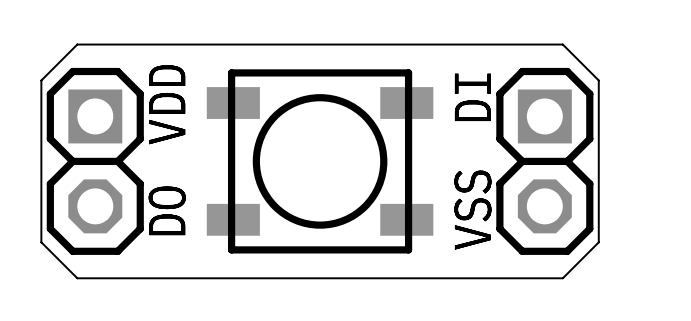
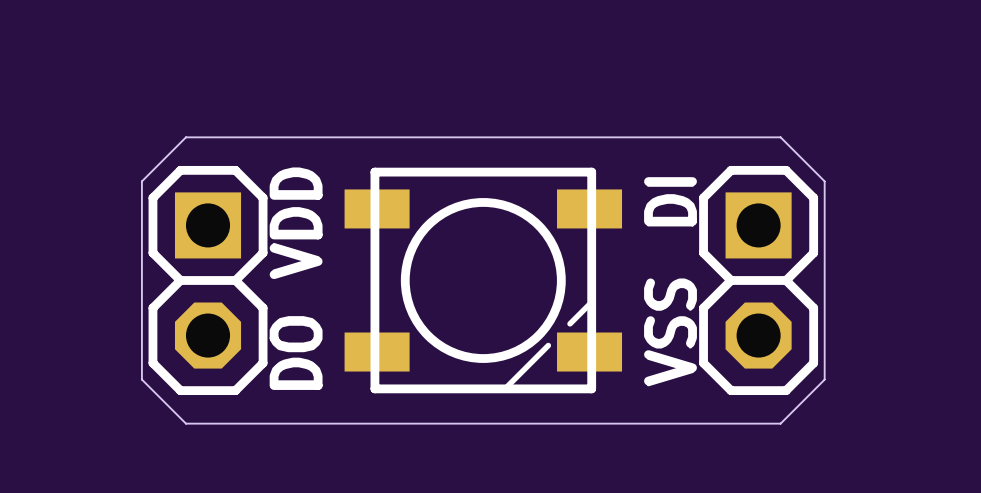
part footprint: [206, 70, 434, 253] -> [344, 169, 623, 392]

